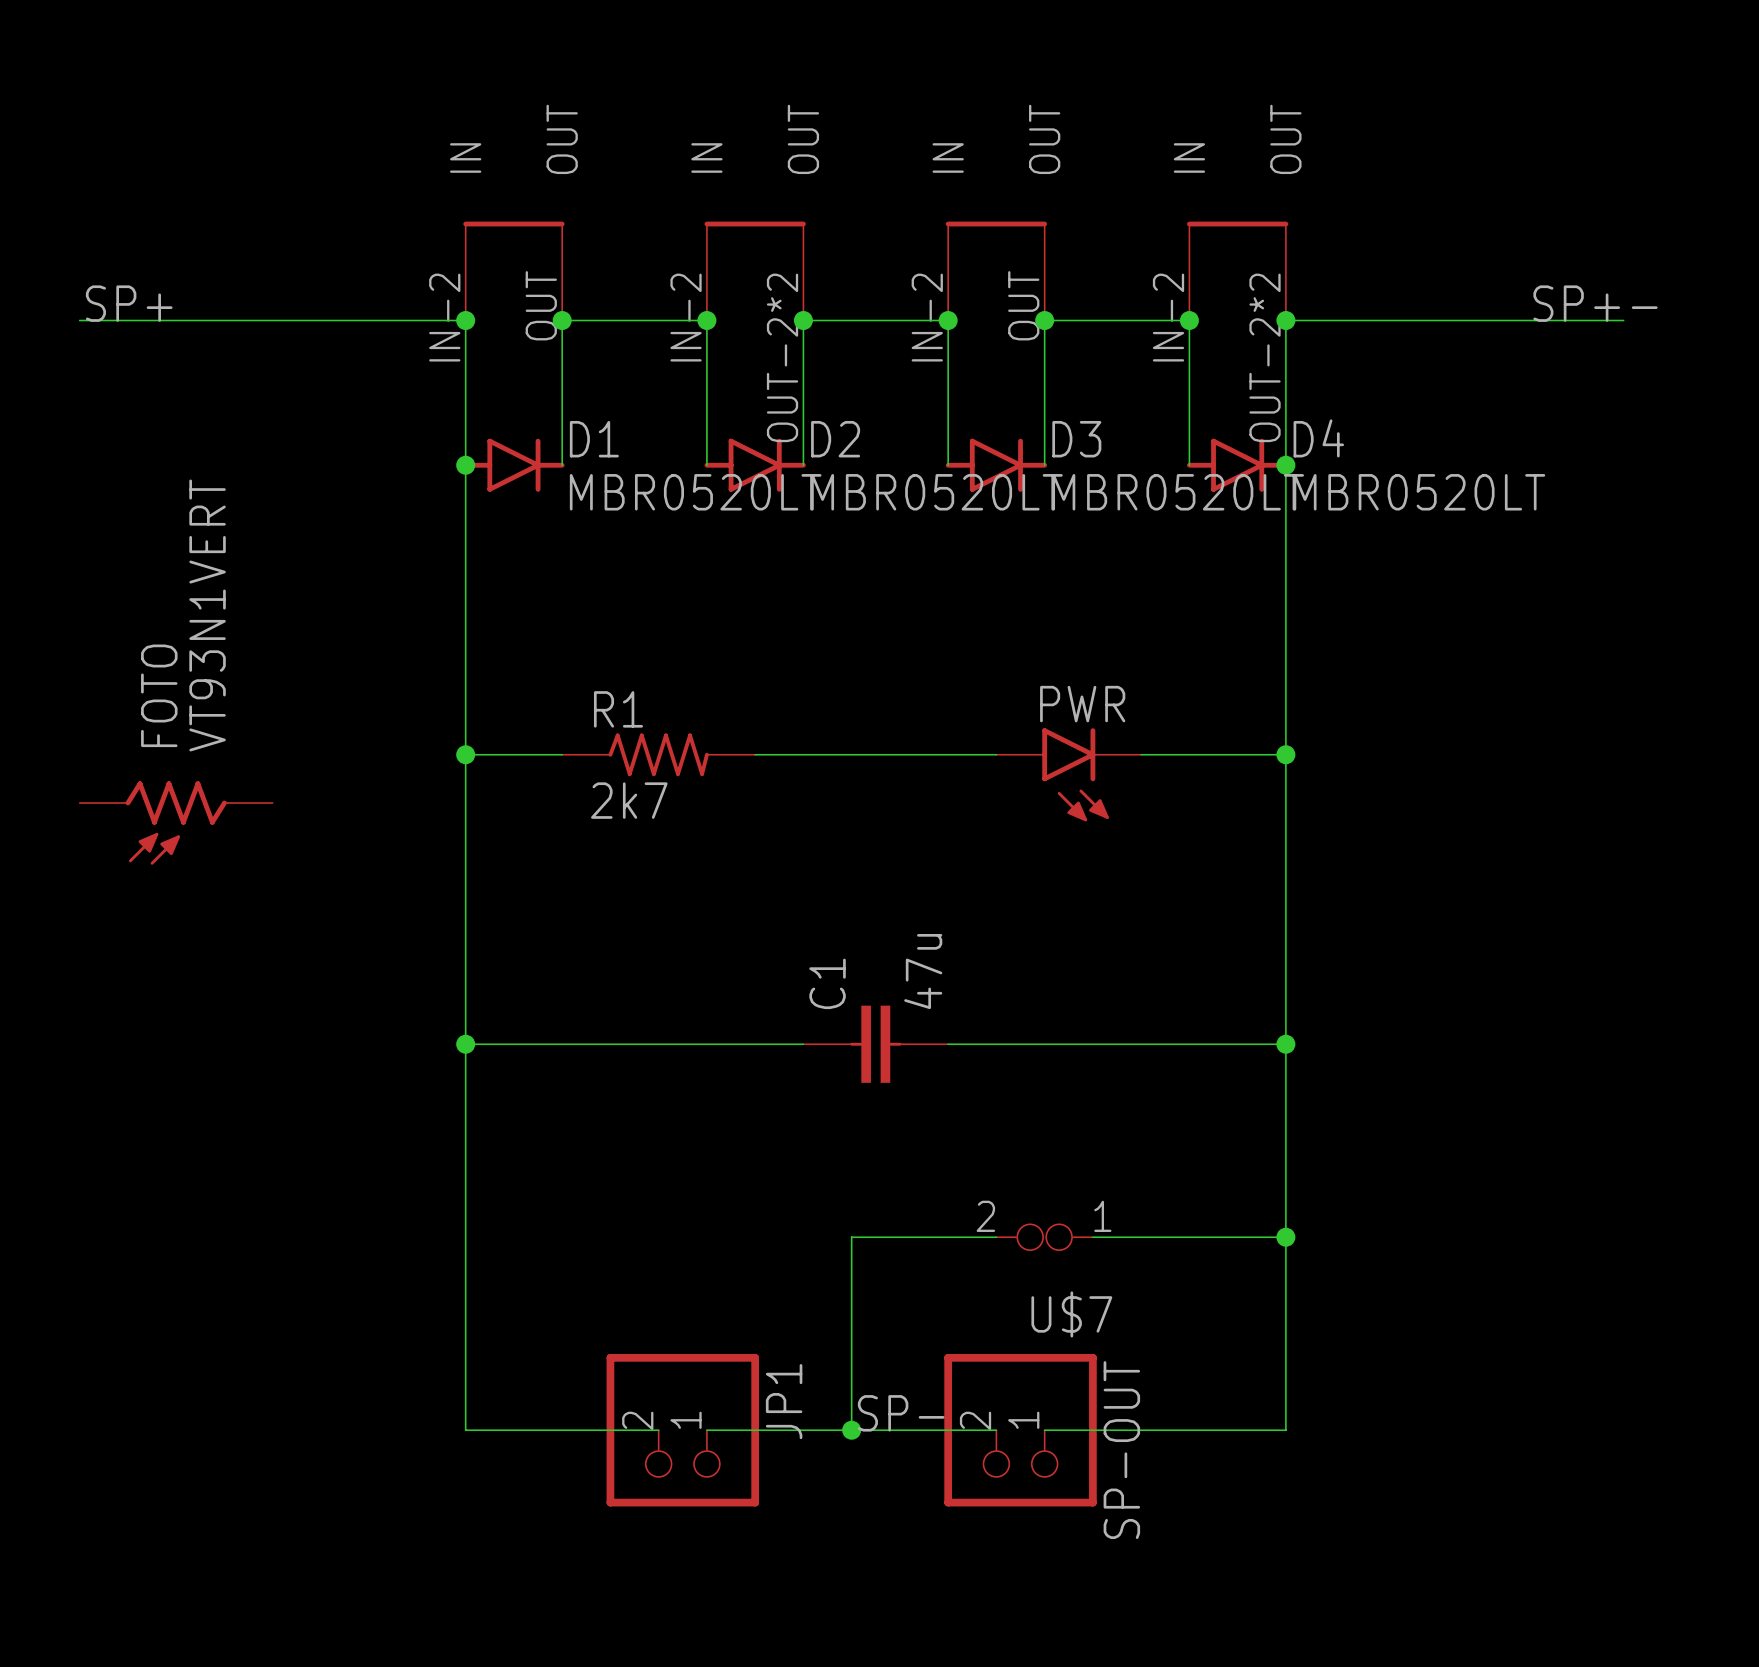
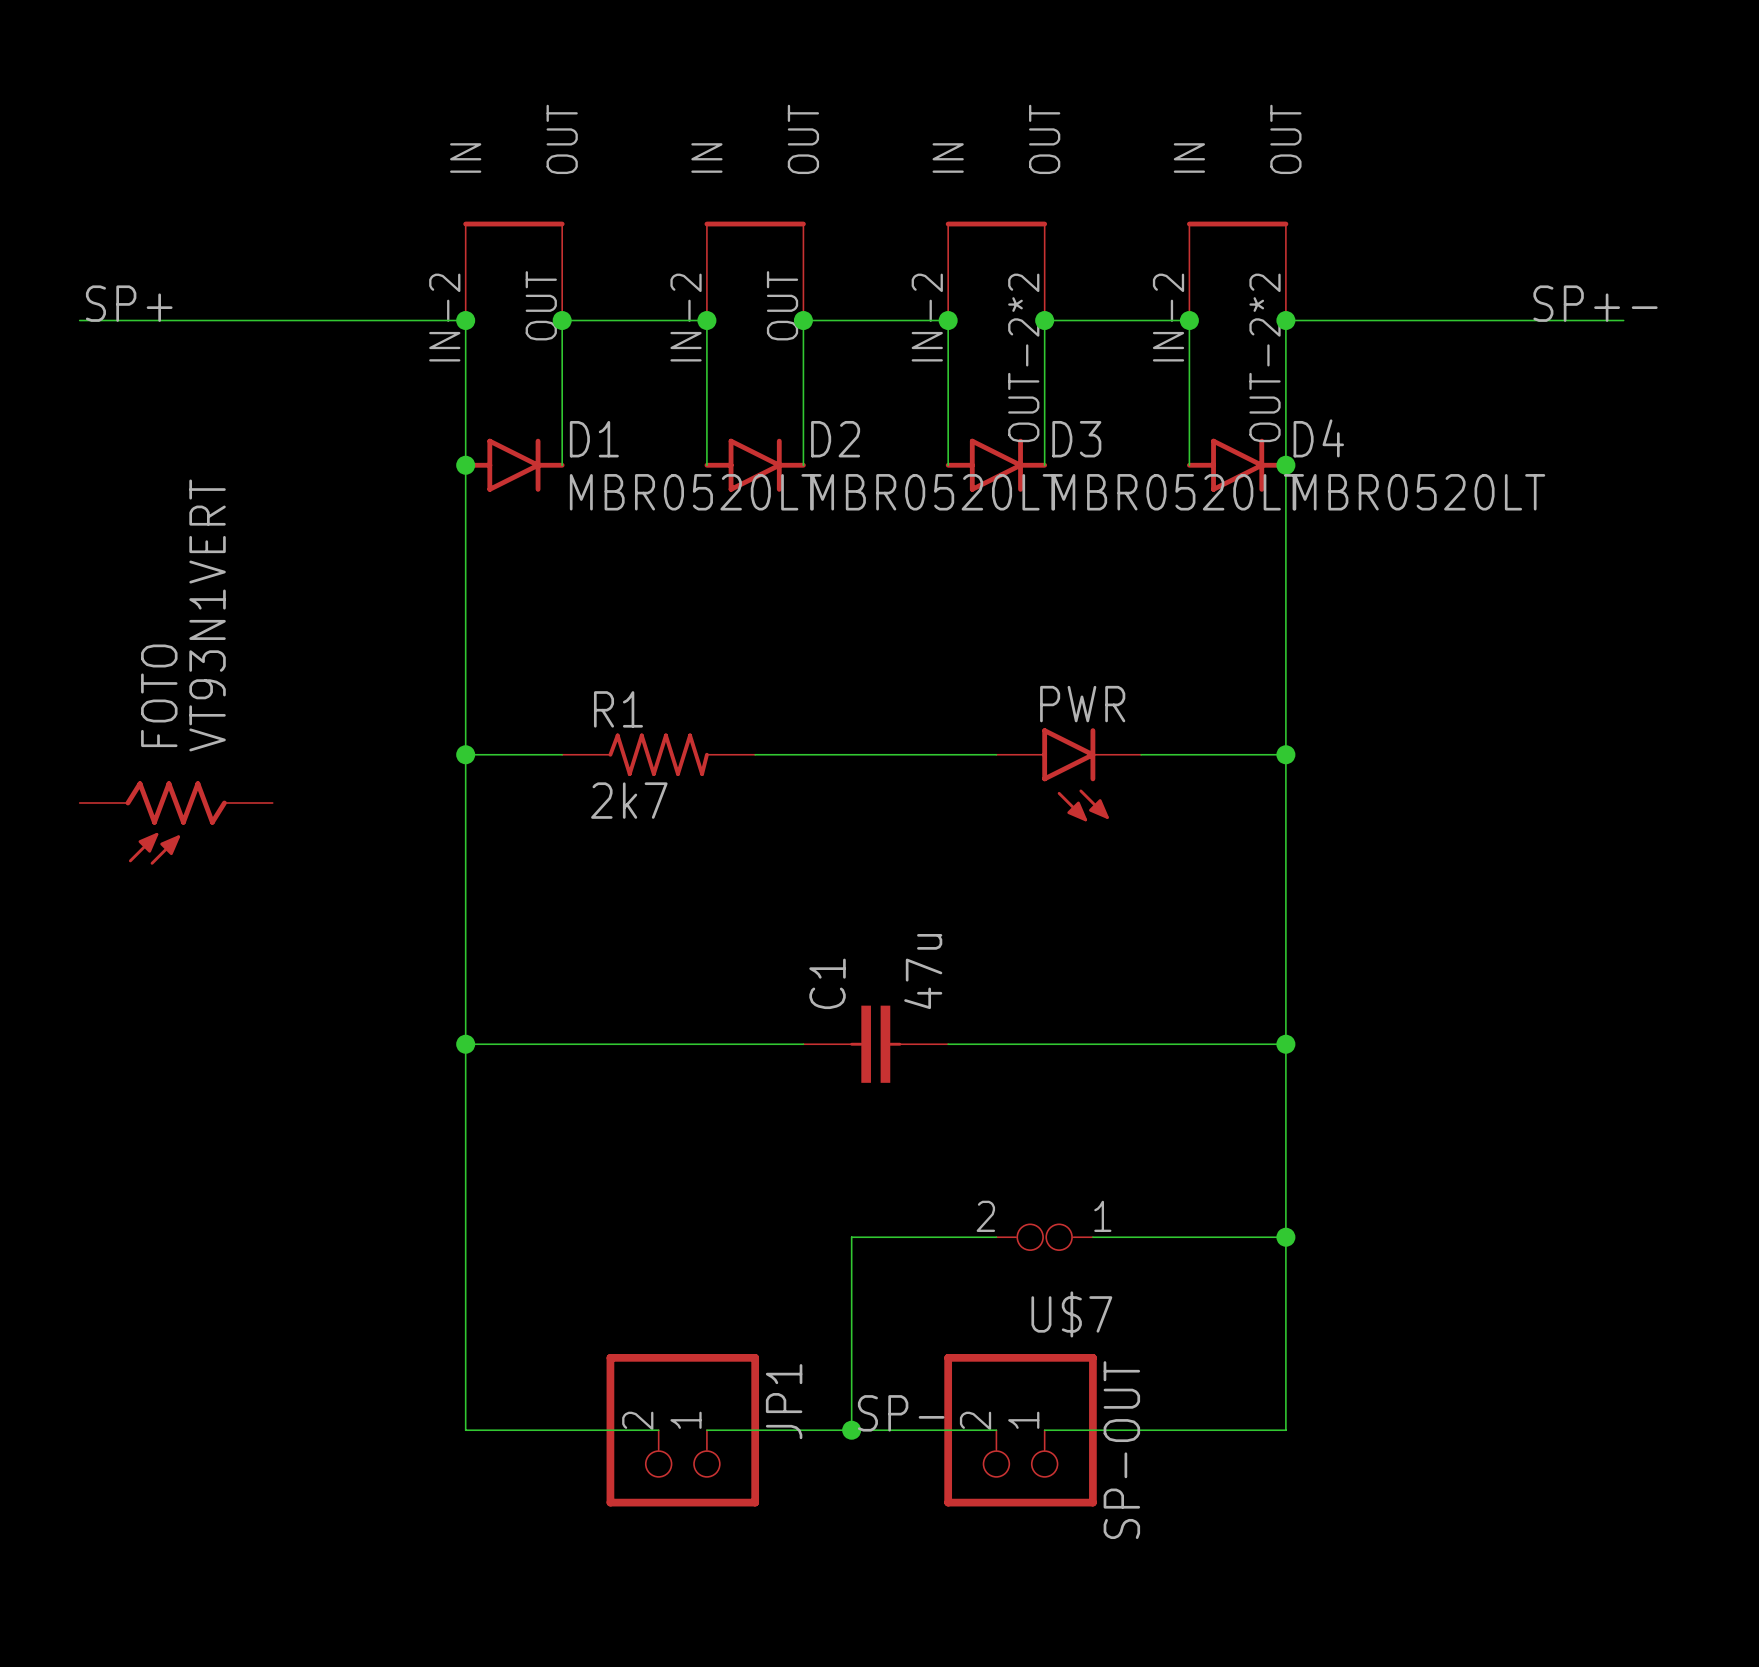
part pin number: OUT (1023, 305) -> OUT-2*2 (1023, 357)
part pin number: OUT-2*2 (782, 357) -> OUT (782, 305)

